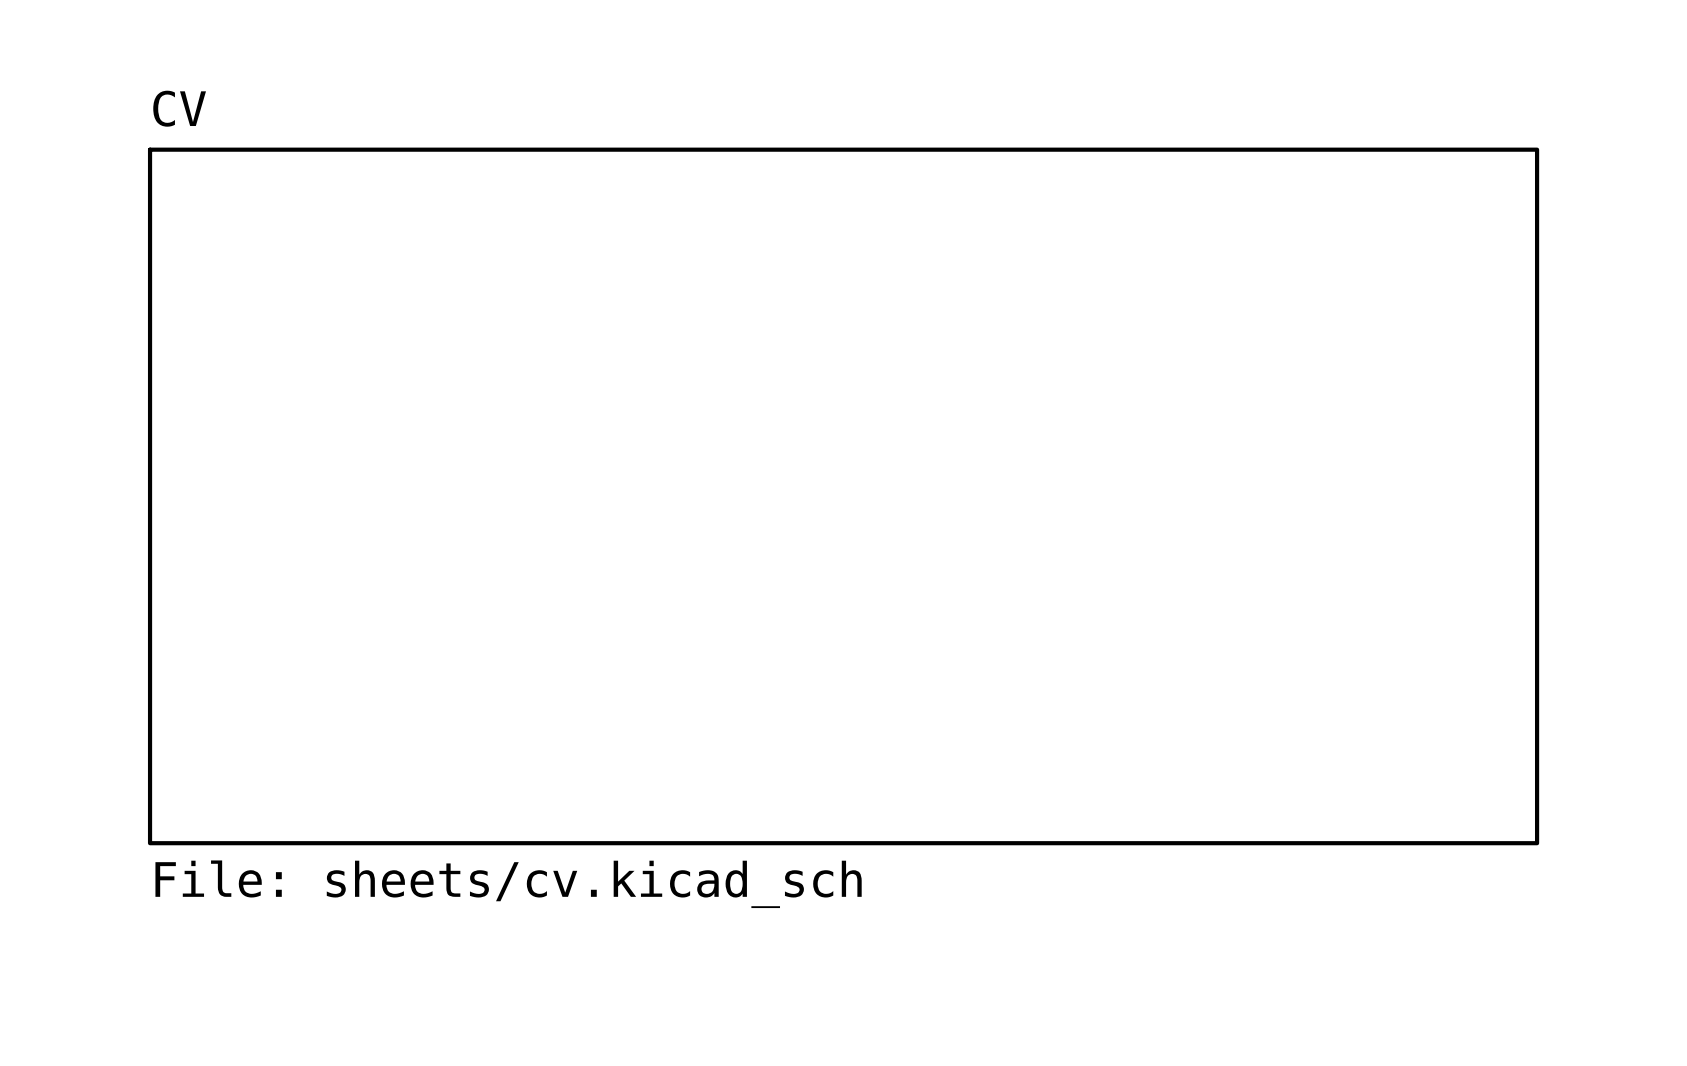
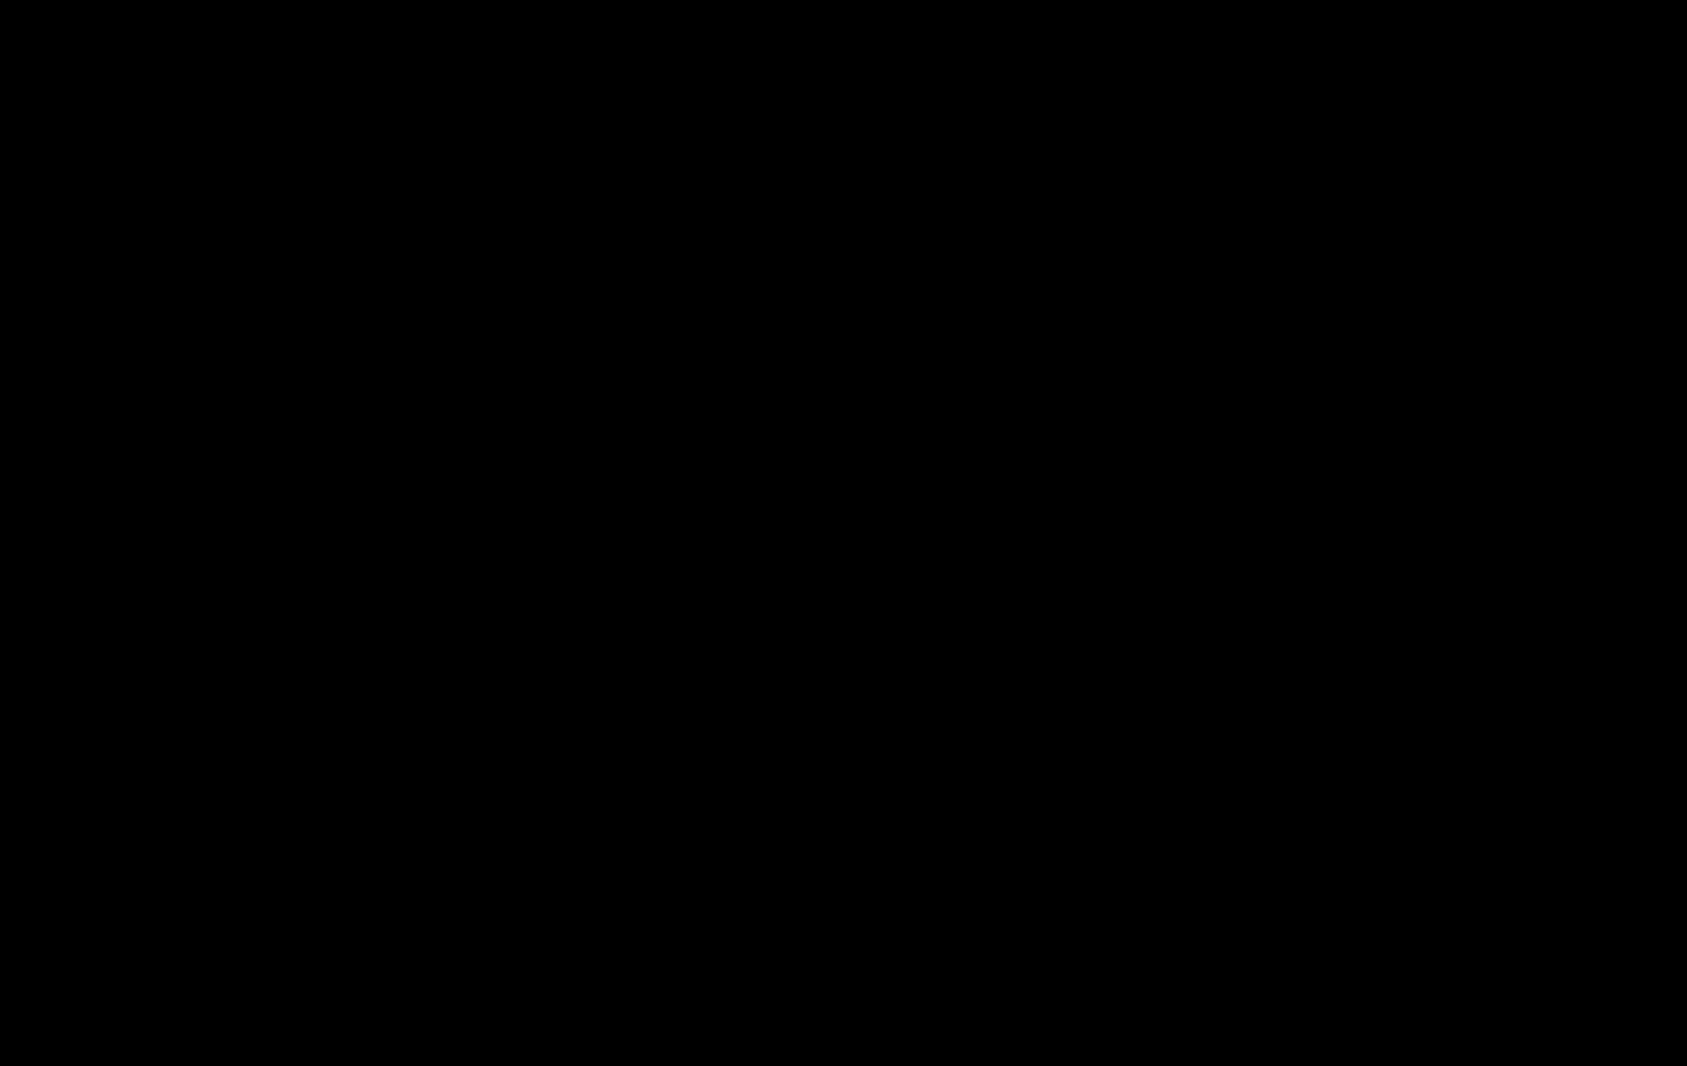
sheet CV: File: sheets/cv.kicad_sch (843, 496) -> none

